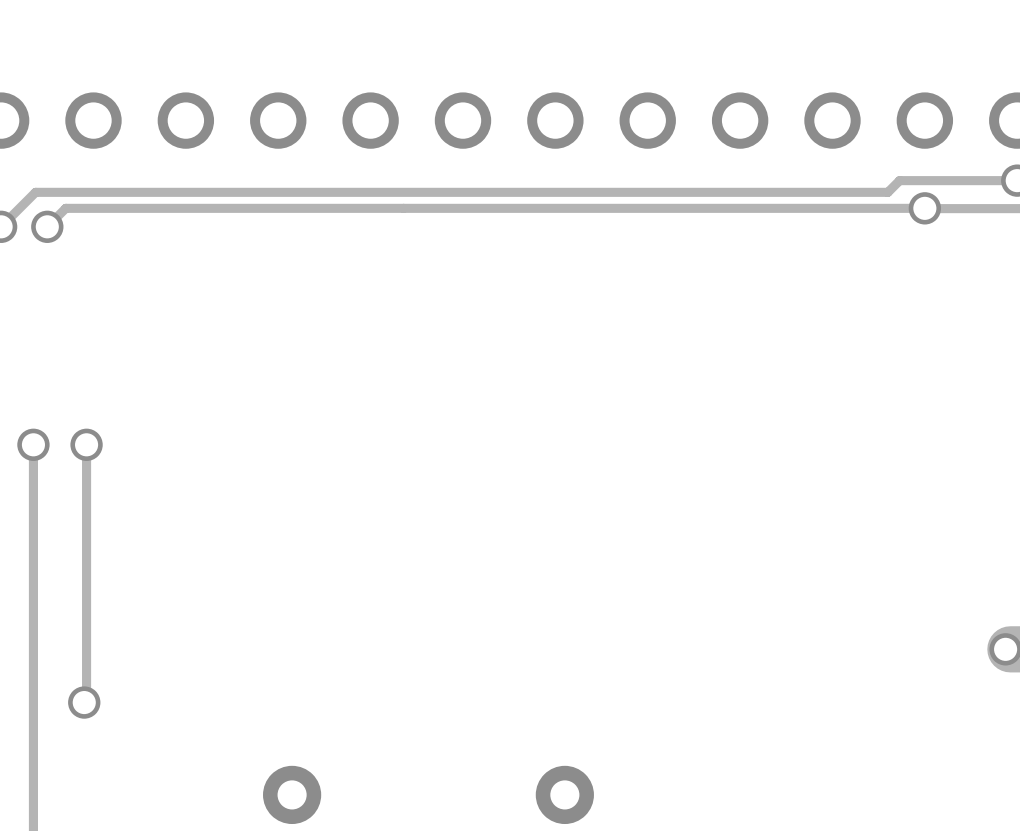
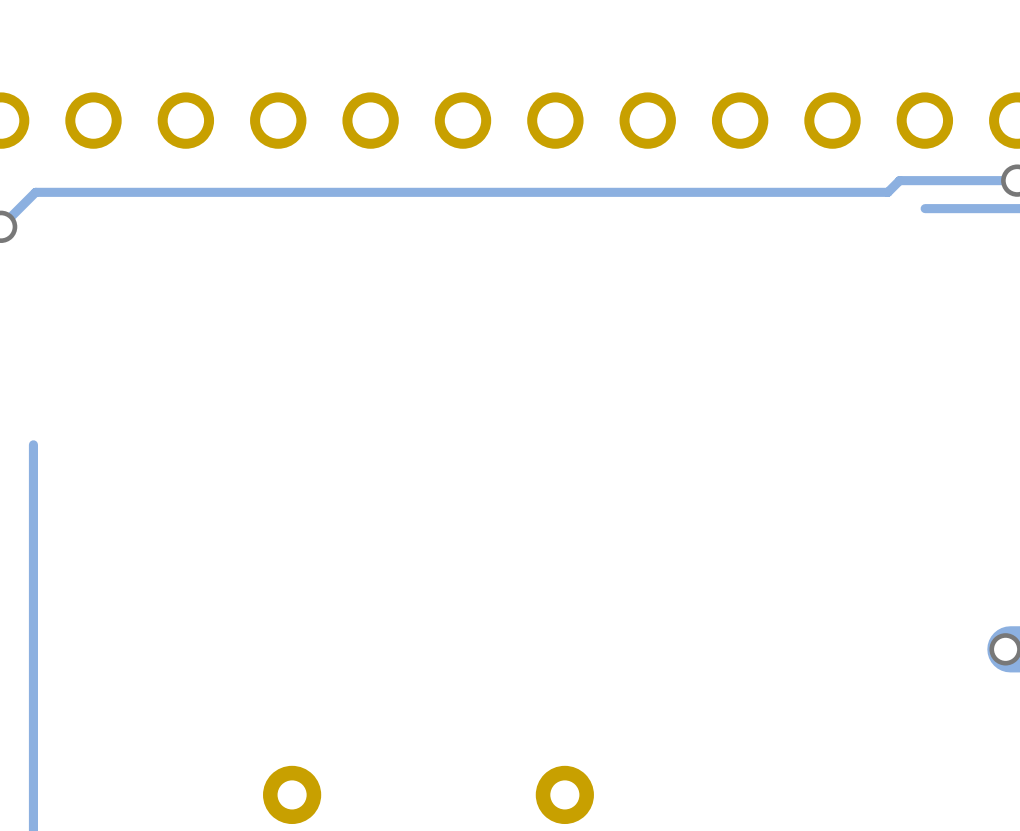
track: (924, 208) (65, 208) (47, 226) -> none
via: (924, 208) -> none
via: (47, 226) -> none
via: (33, 444) -> none
track: (86, 444) (86, 700) (84, 702) -> none
via: (86, 444) -> none
via: (84, 702) -> none

